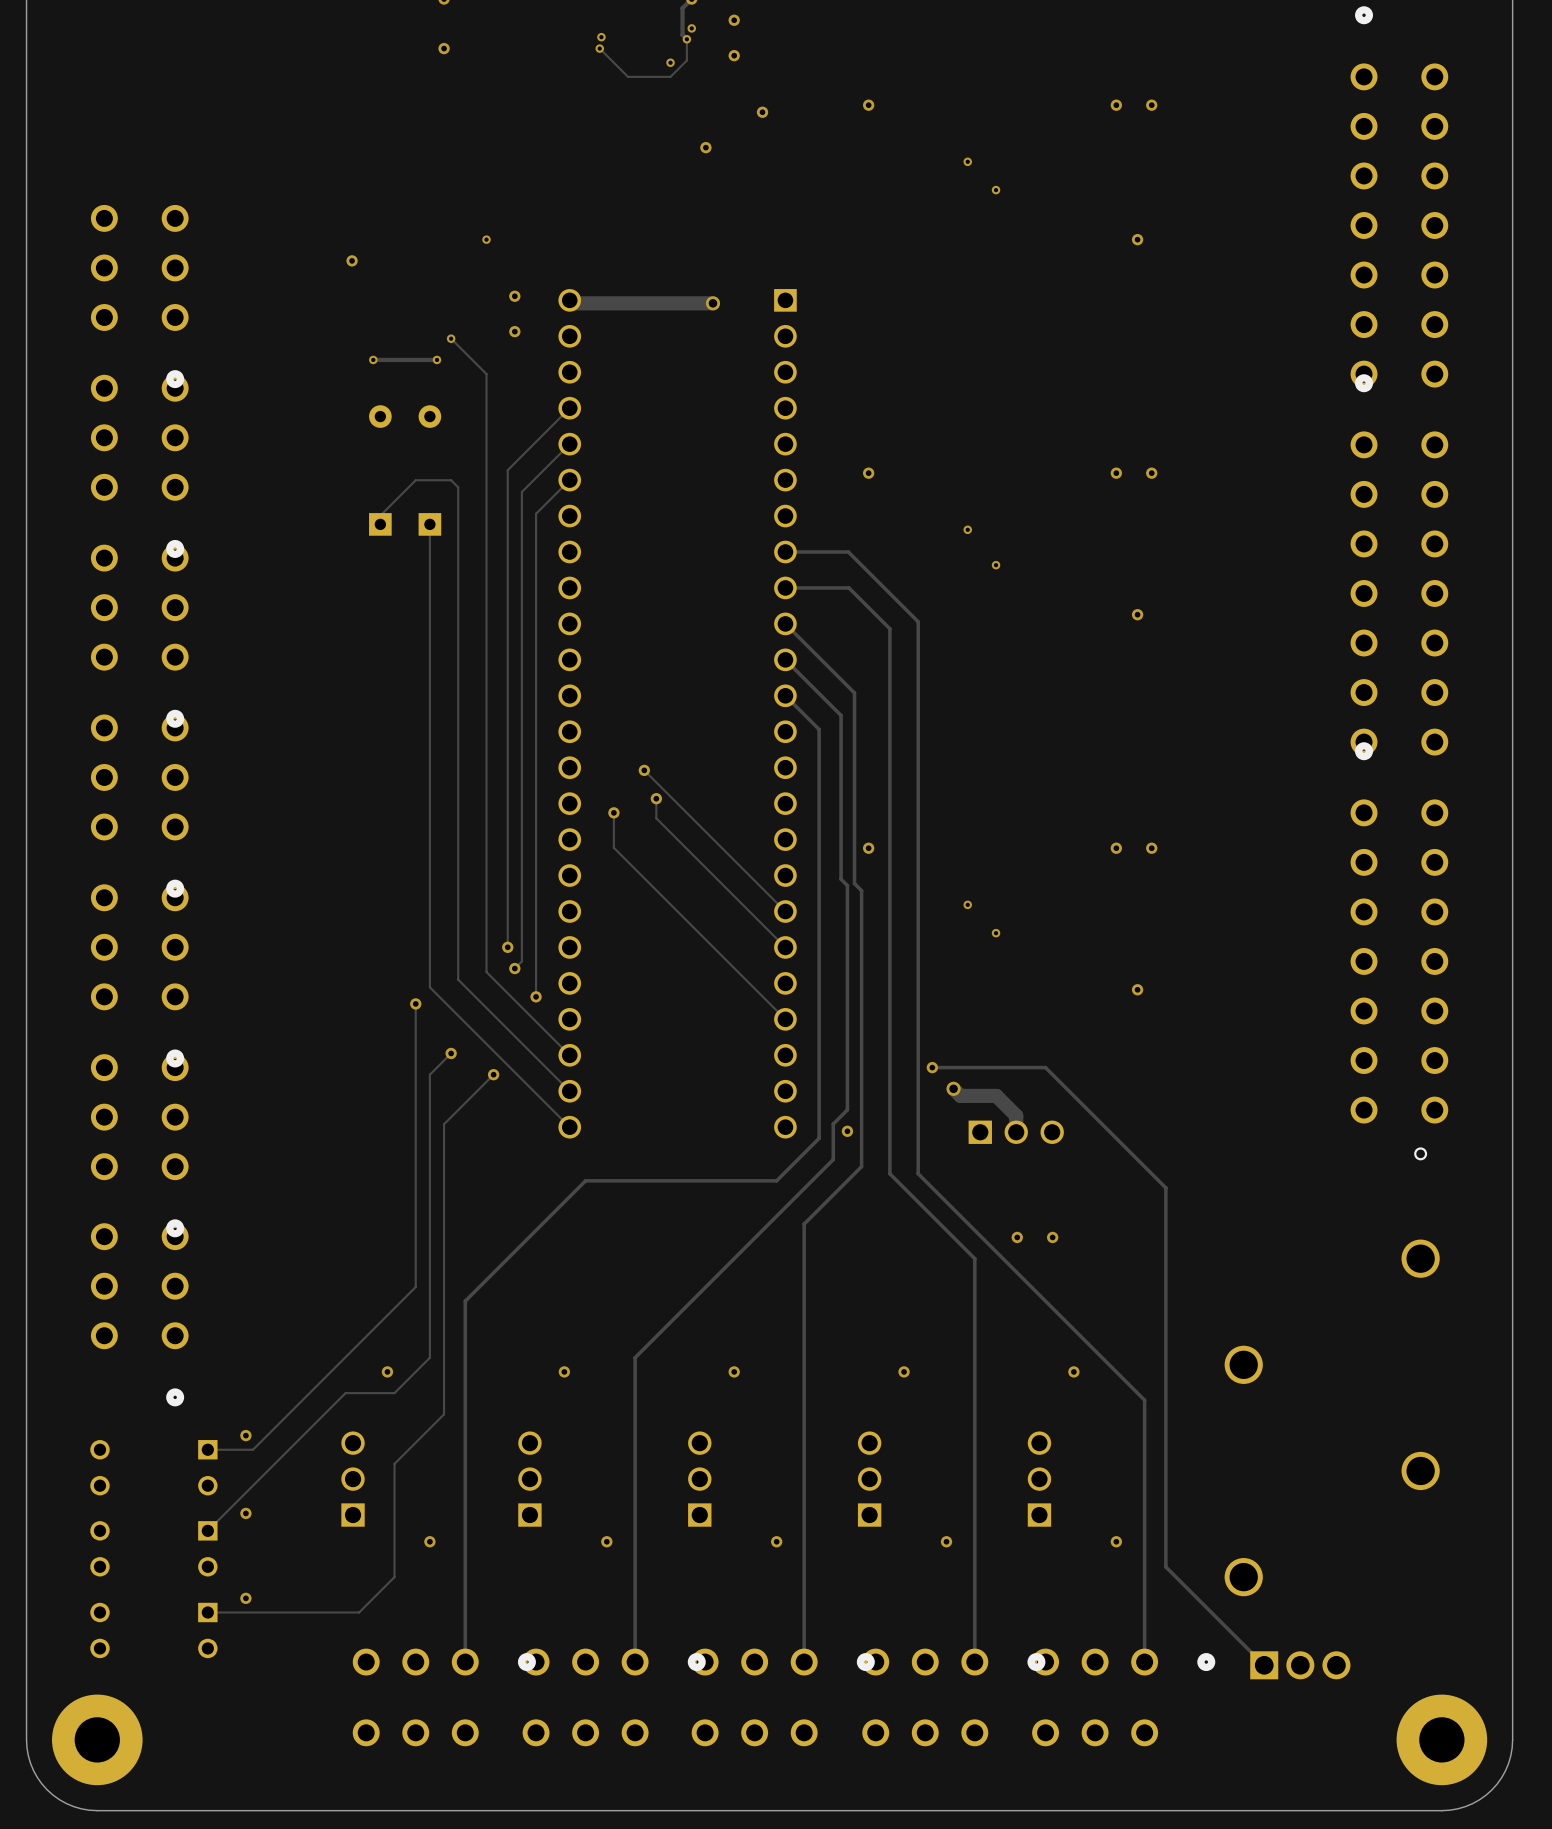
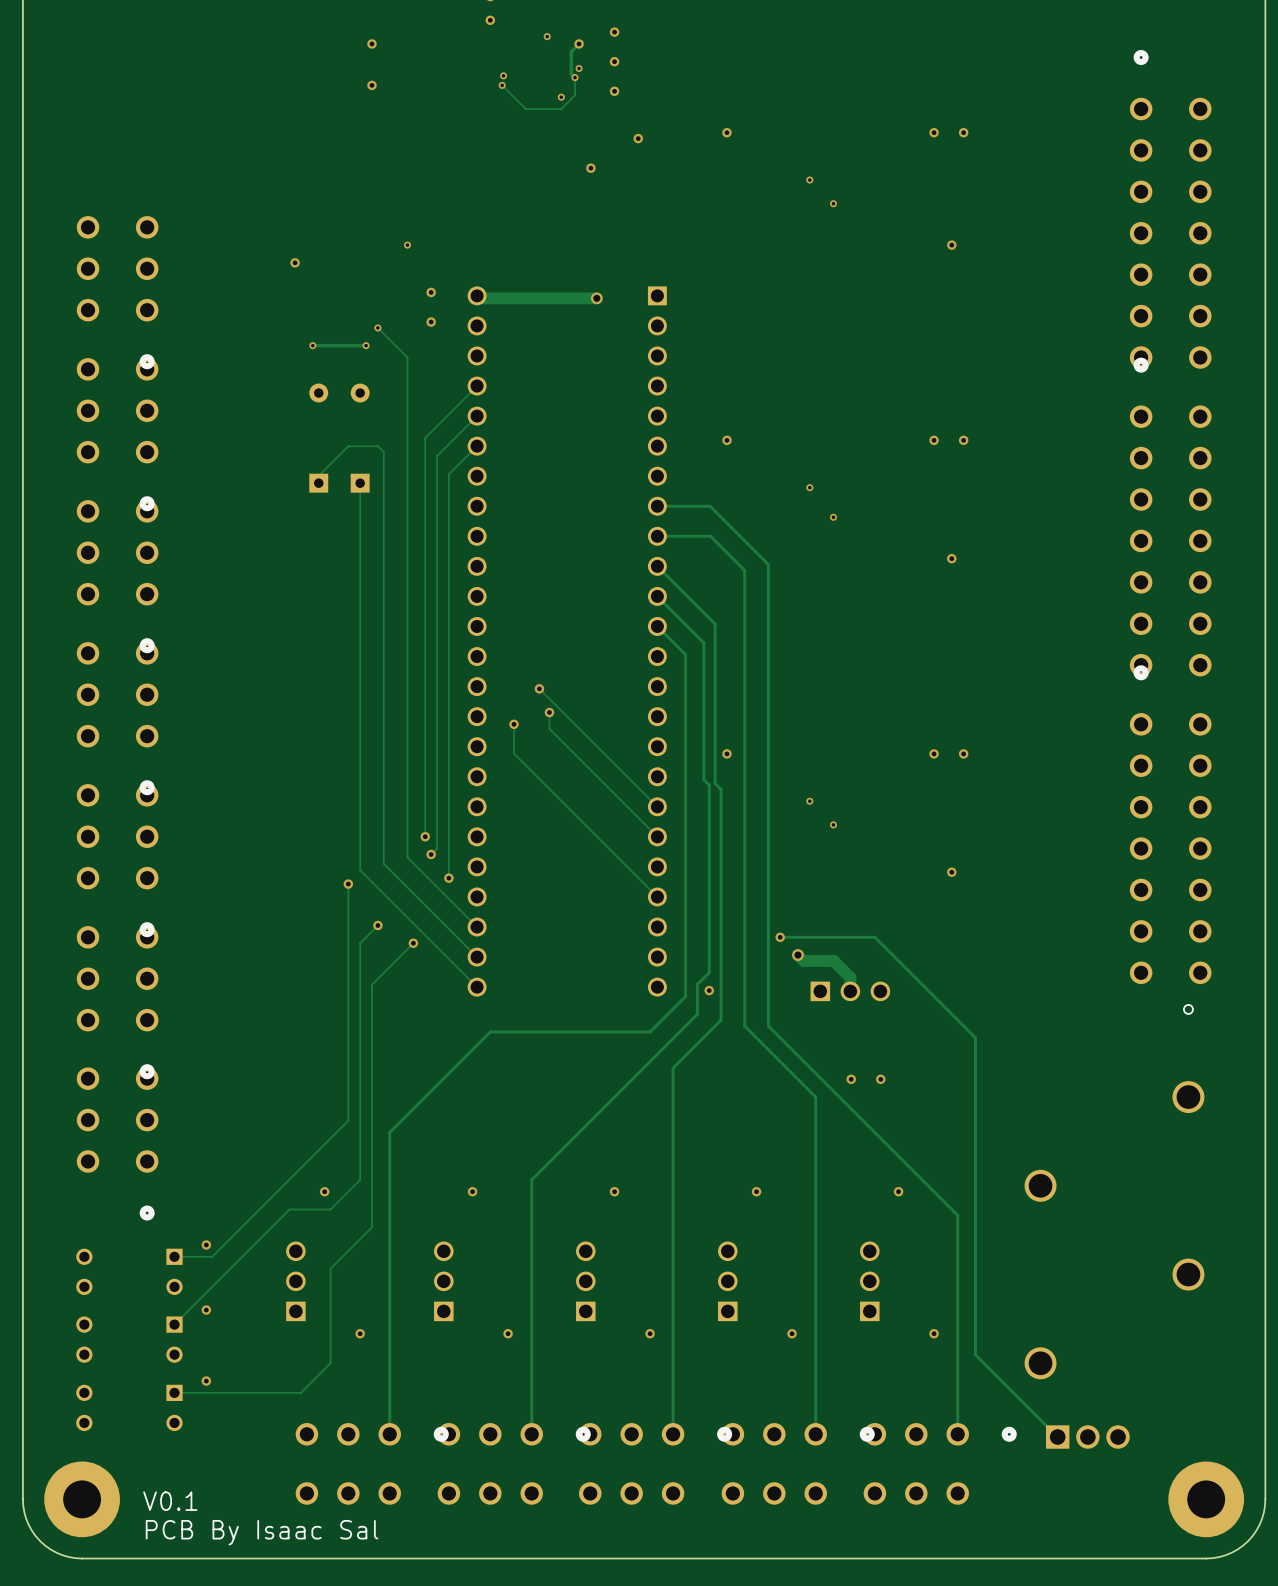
text: none -> V0.1 (170, 1501)
text: none -> PCB By Isaac Sal (262, 1532)

